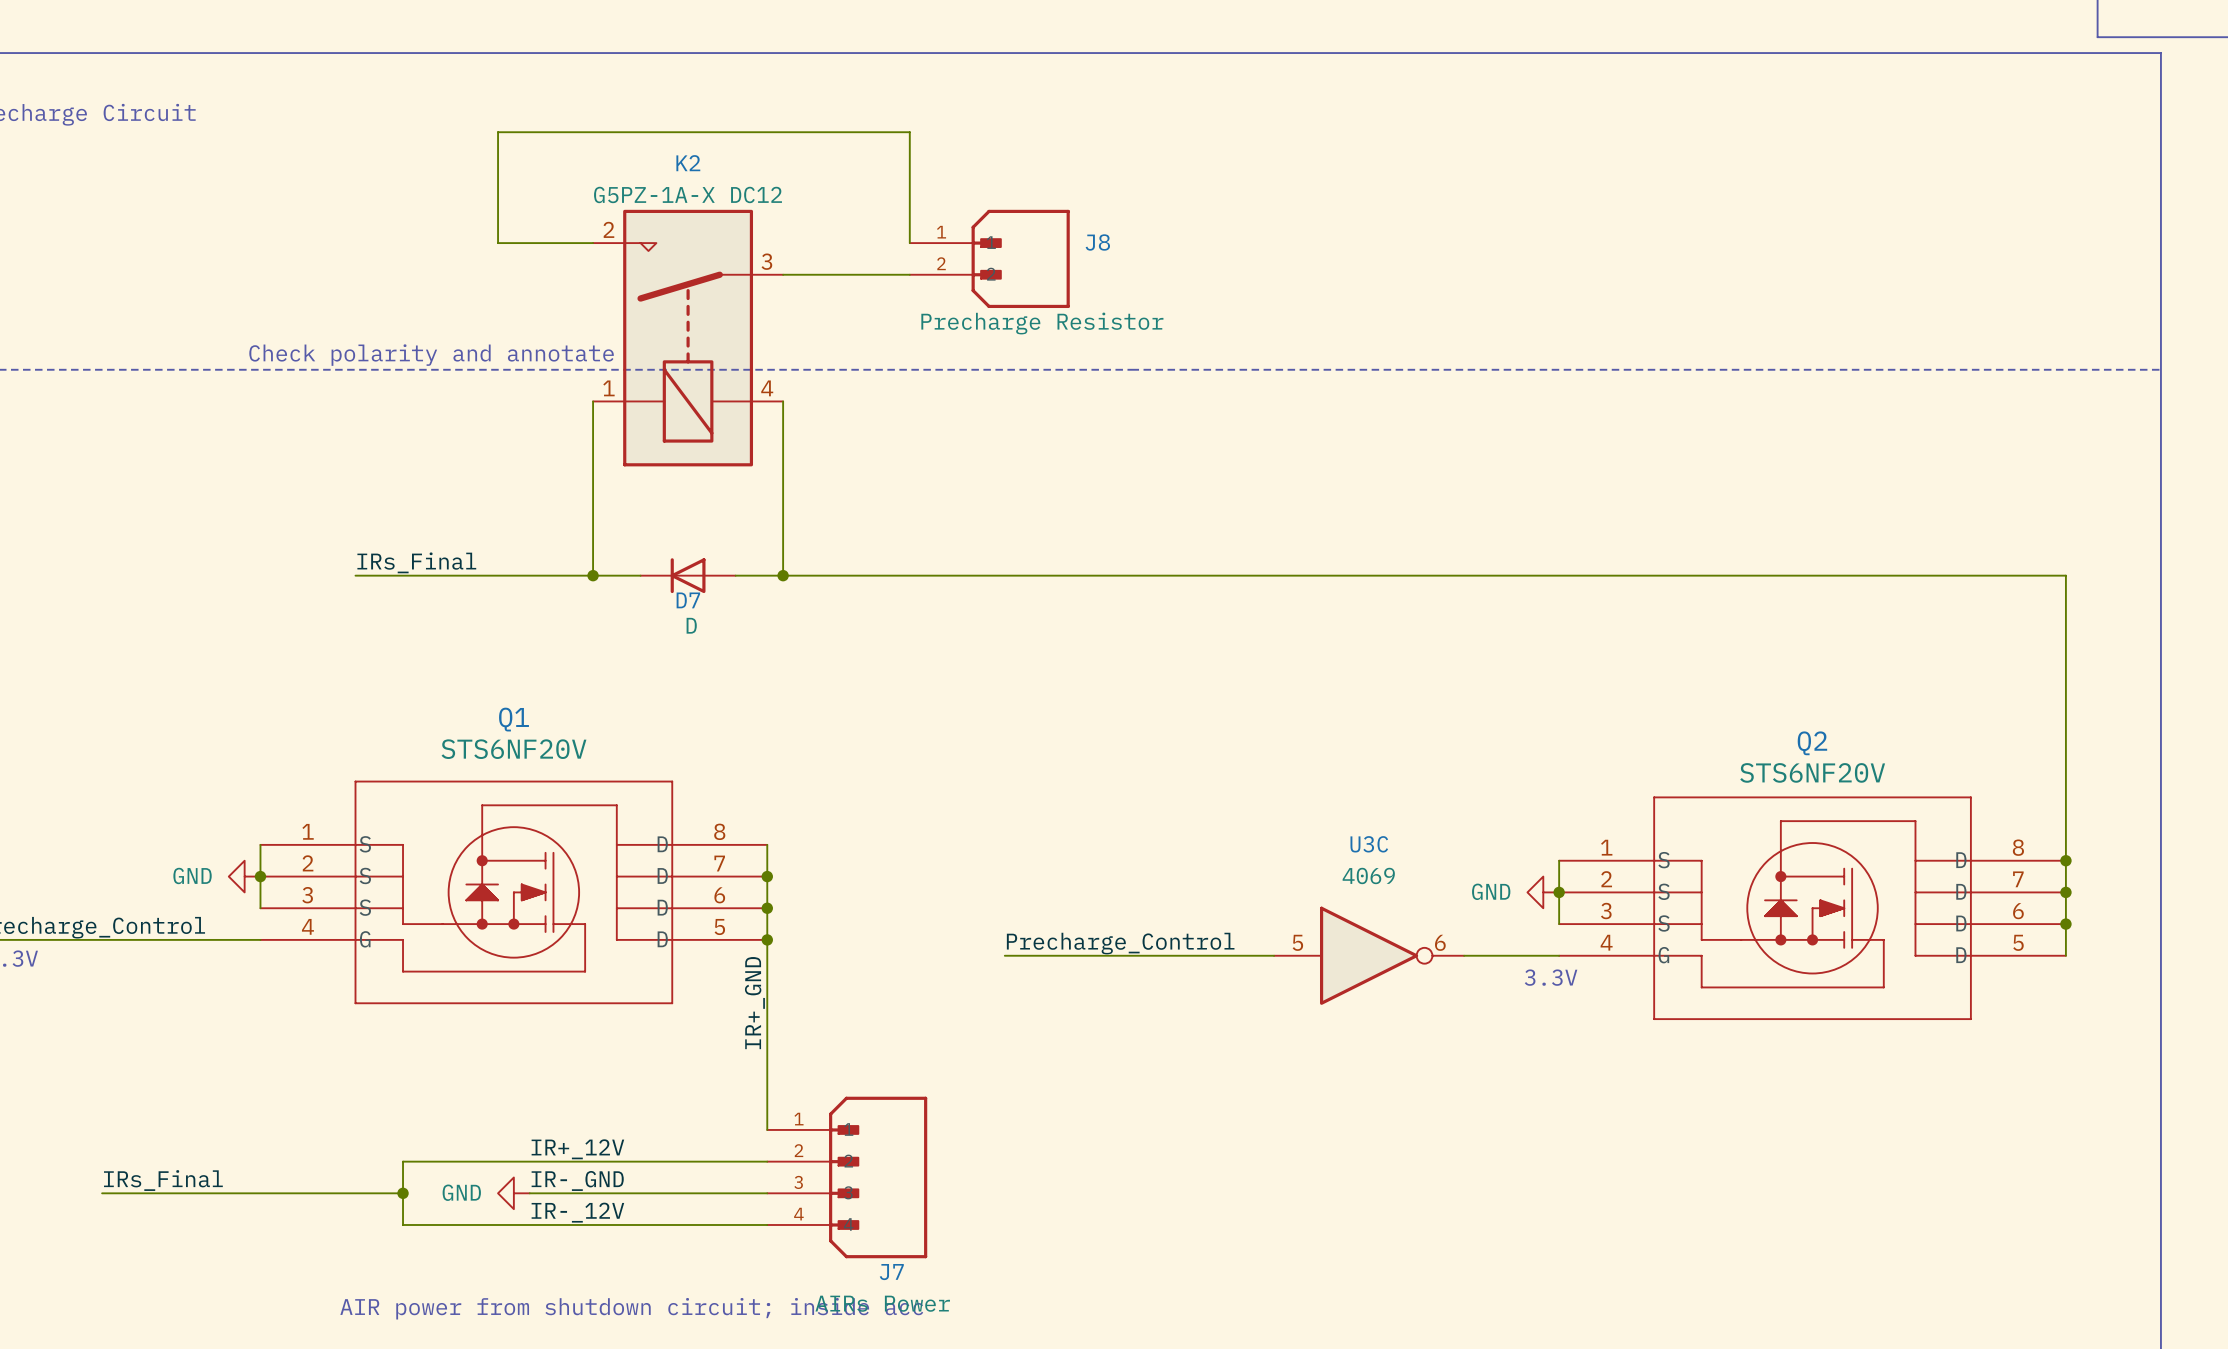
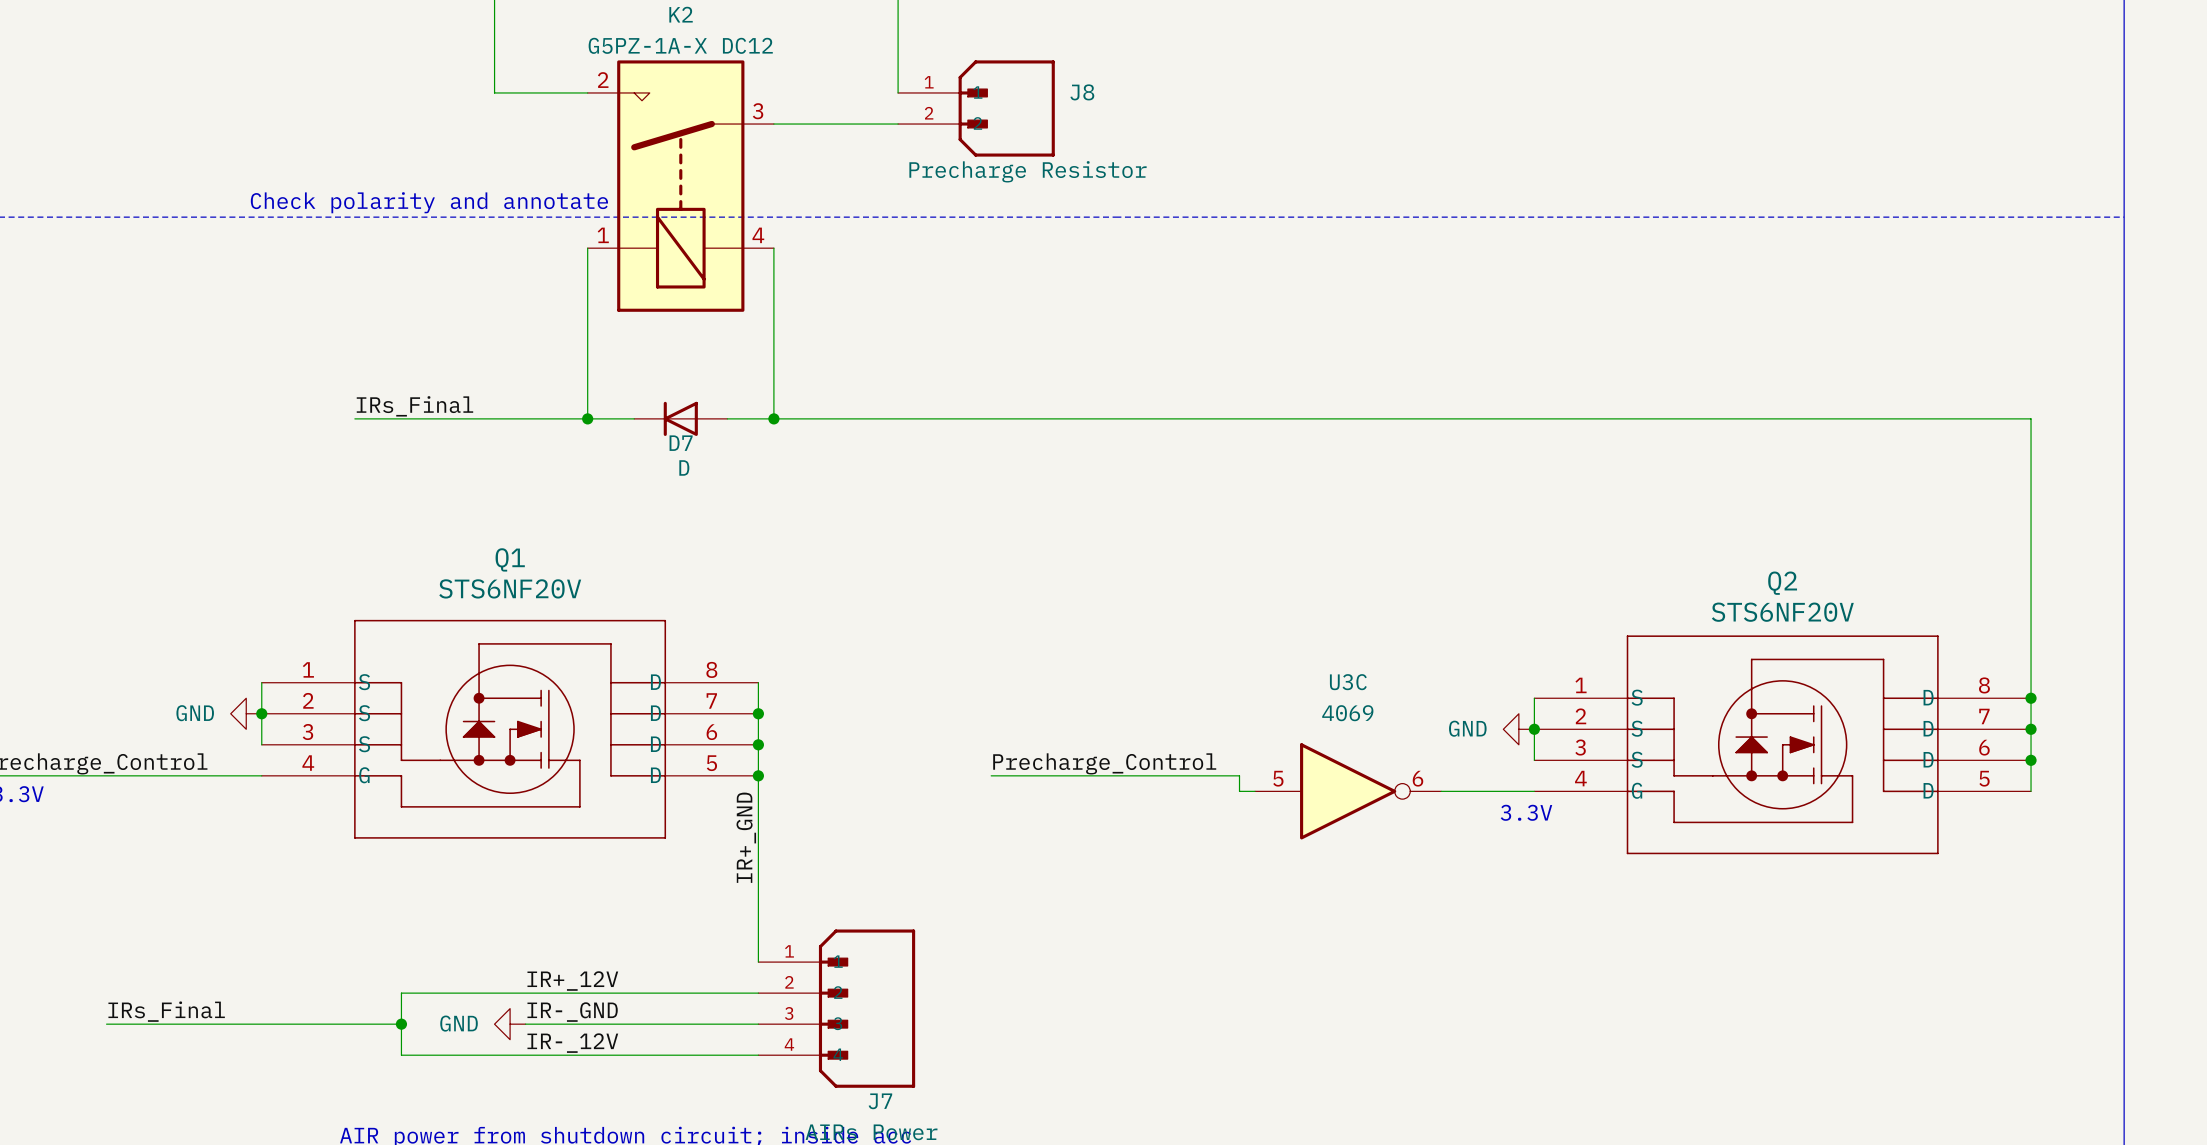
label position: Precharge_Control (1120, 943) -> Precharge_Control (1104, 763)
wire: (1004, 955) (1258, 955) -> (991, 775) (1239, 775) (1239, 791)

